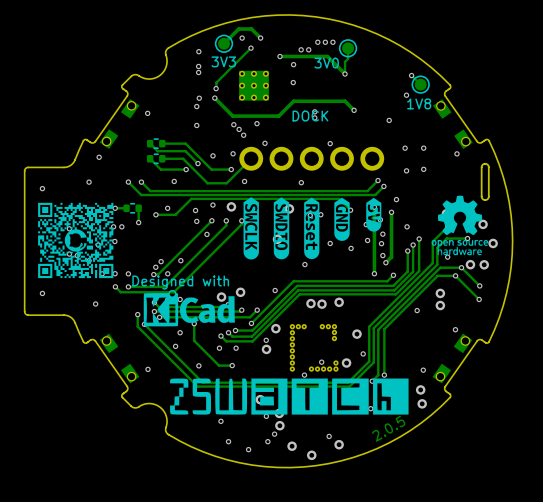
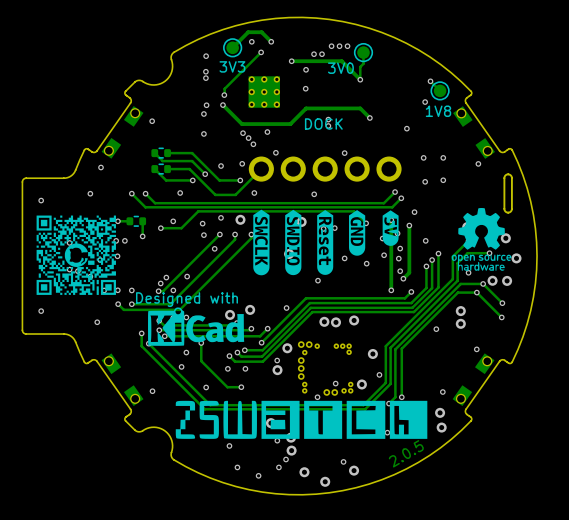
round board edge: none -> [298, 341, 305, 348]
round board edge: none -> [306, 341, 313, 348]
round board edge: [290, 324, 295, 329] -> none
round board edge: [296, 324, 301, 329] -> none
round board edge: [290, 336, 295, 341] -> none
round board edge: [332, 336, 337, 341] -> none
round board edge: none -> [298, 357, 305, 364]
round board edge: [290, 342, 295, 347] -> none
round board edge: none -> [298, 365, 305, 372]
round board edge: [290, 348, 295, 353] -> none
round board edge: none -> [298, 373, 305, 380]
round board edge: [290, 354, 295, 360] -> none
round board edge: [309, 366, 314, 372] -> none
round board edge: [315, 366, 320, 372] -> none
round board edge: [321, 366, 326, 372] -> none
round board edge: none -> [323, 389, 330, 396]
round board edge: none -> [331, 389, 338, 396]

